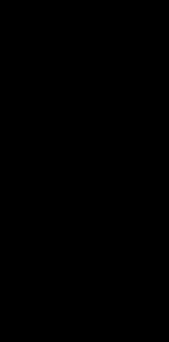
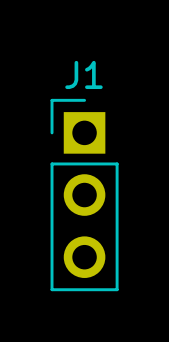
J1: none -> (84, 195)

